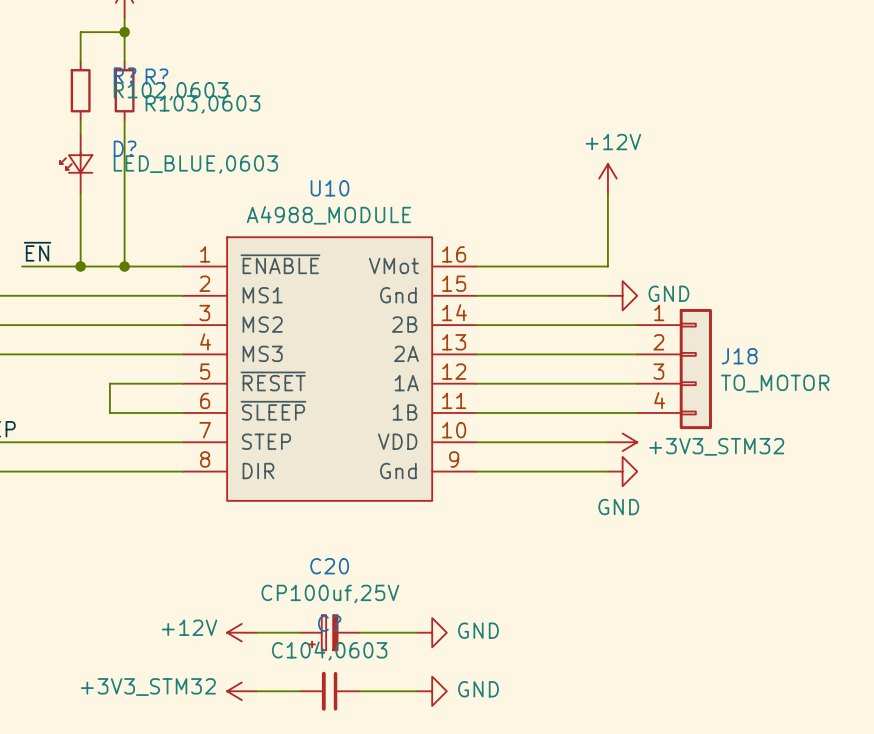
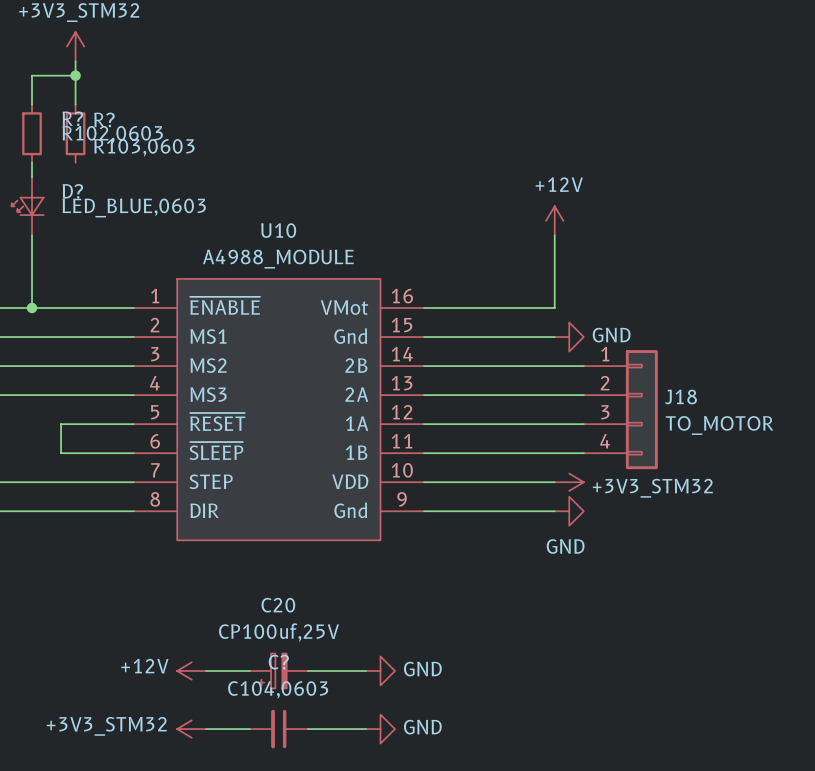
wire: (124, 120) (124, 266) -> none
junction: (124, 266) -> none

